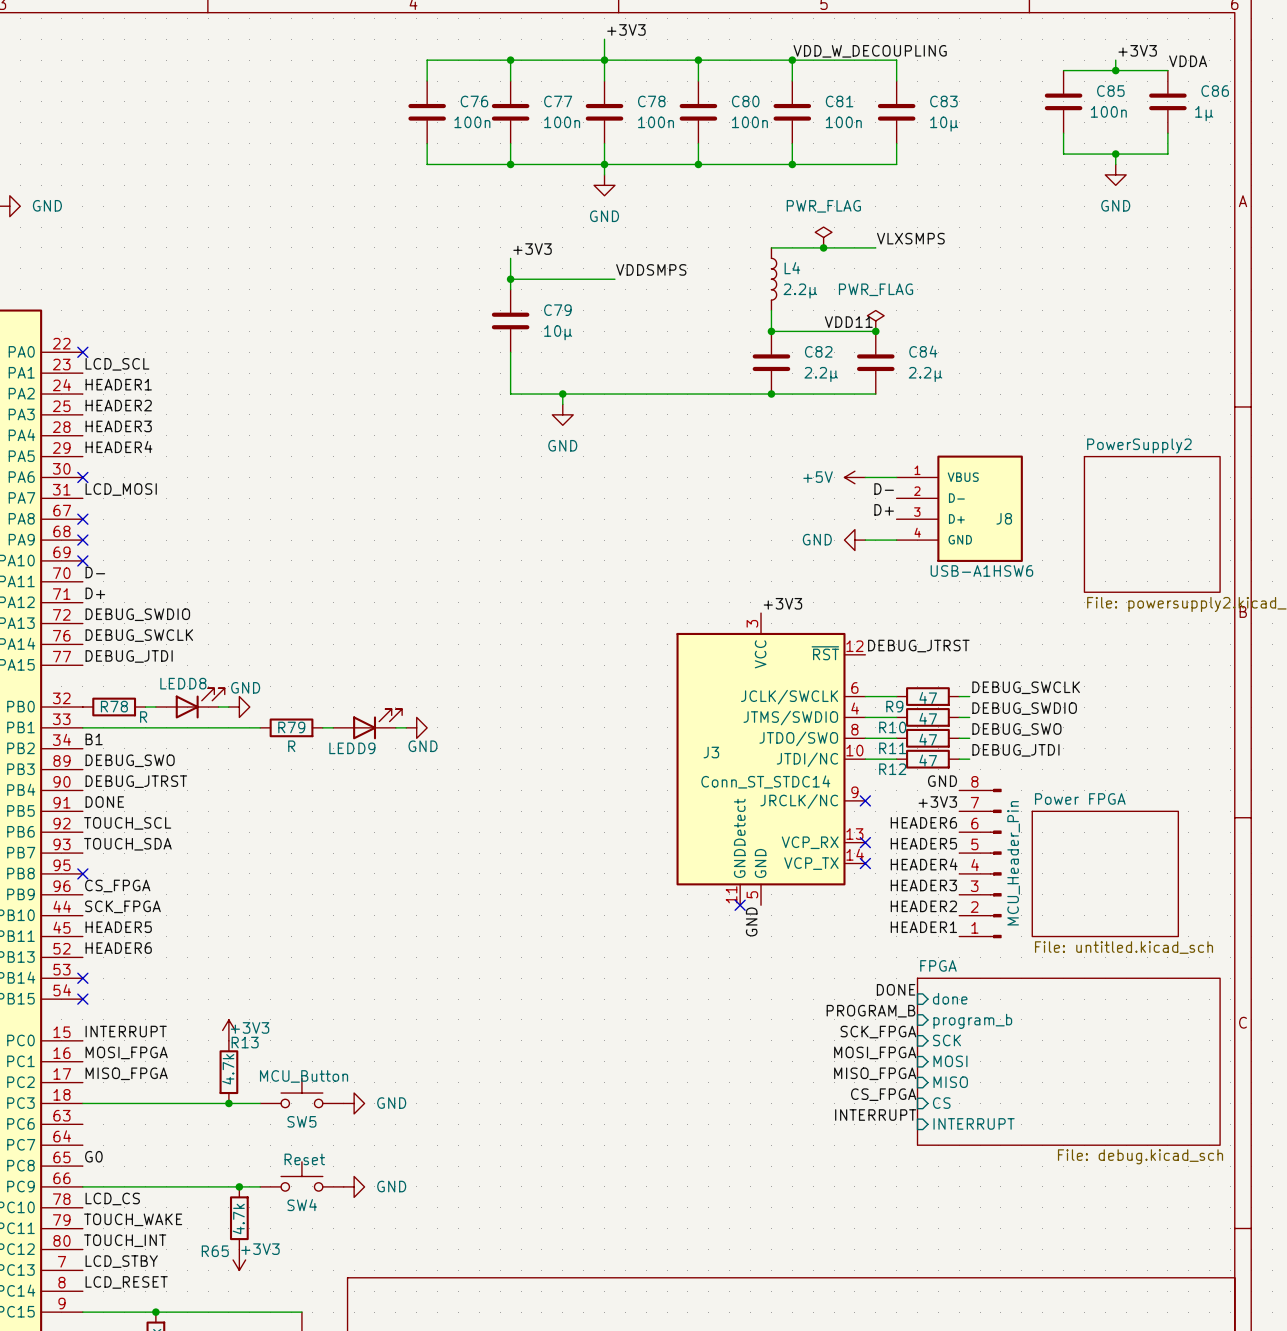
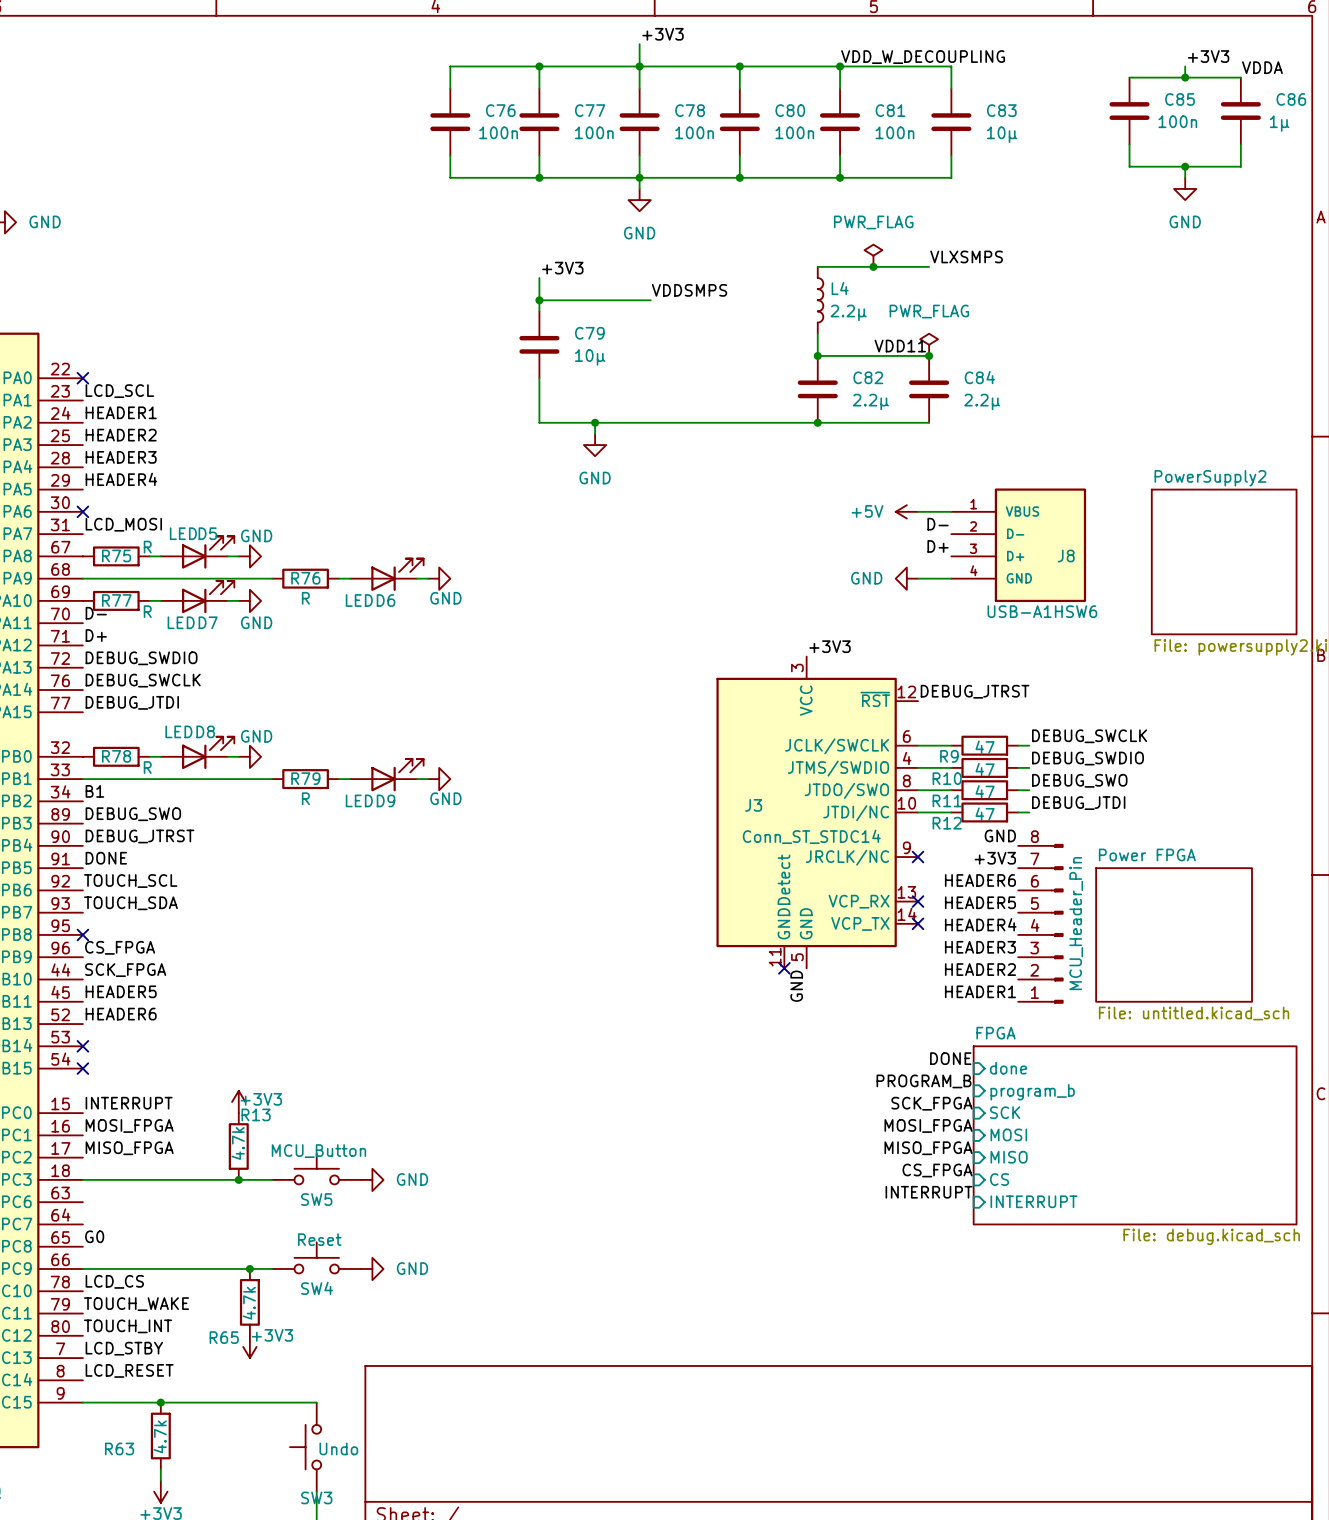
D5: none -> LED (197, 552)
no-connect mark: (82, 519) -> none
R75: none -> R (116, 556)
wire: none -> (149, 556) (160, 556)
wire: none -> (227, 556) (238, 556)
power symbol: none -> GND (249, 556)
D6: none -> LED (386, 574)
wire: none -> (82, 578) (272, 578)
no-connect mark: (82, 540) -> none
R76: none -> R (305, 578)
wire: none -> (338, 578) (350, 578)
wire: none -> (416, 578) (428, 578)
power symbol: none -> GND (439, 578)
D7: none -> LED (197, 597)
no-connect mark: (82, 560) -> none
R77: none -> R (116, 600)
wire: none -> (149, 600) (160, 600)
wire: none -> (227, 600) (238, 600)
power symbol: none -> GND (249, 600)

